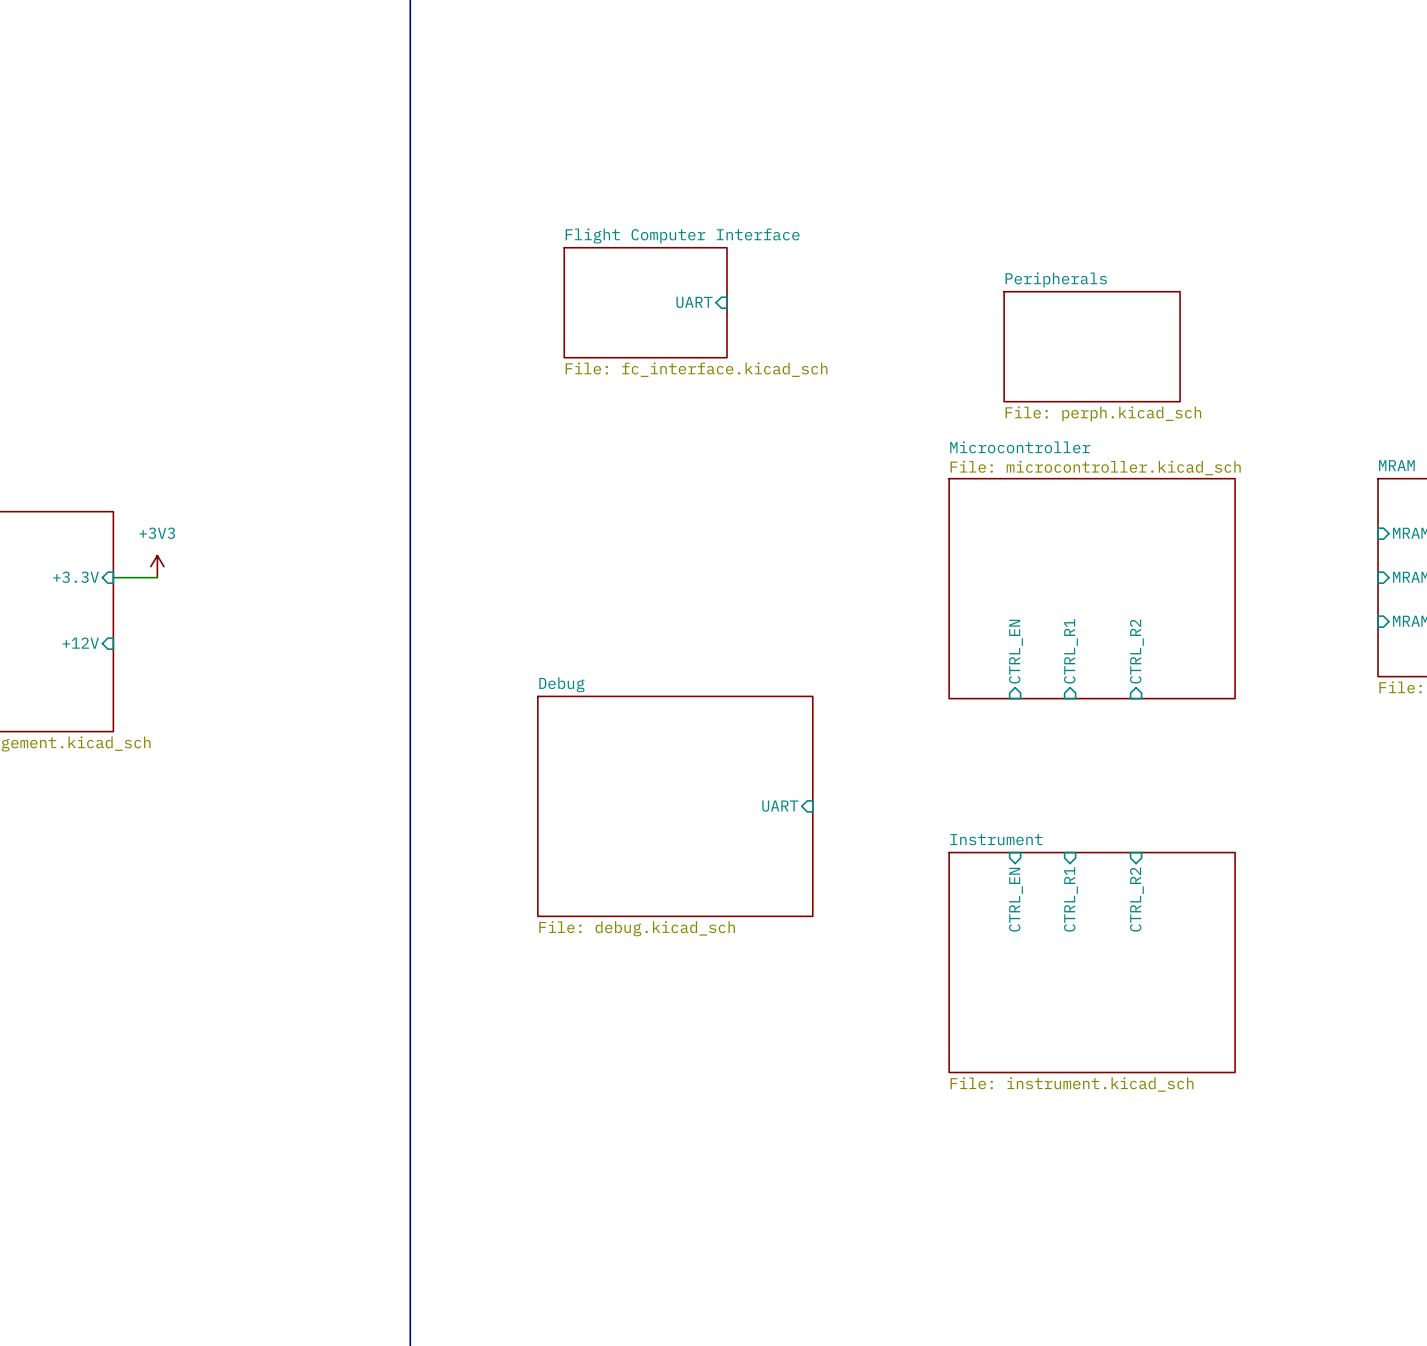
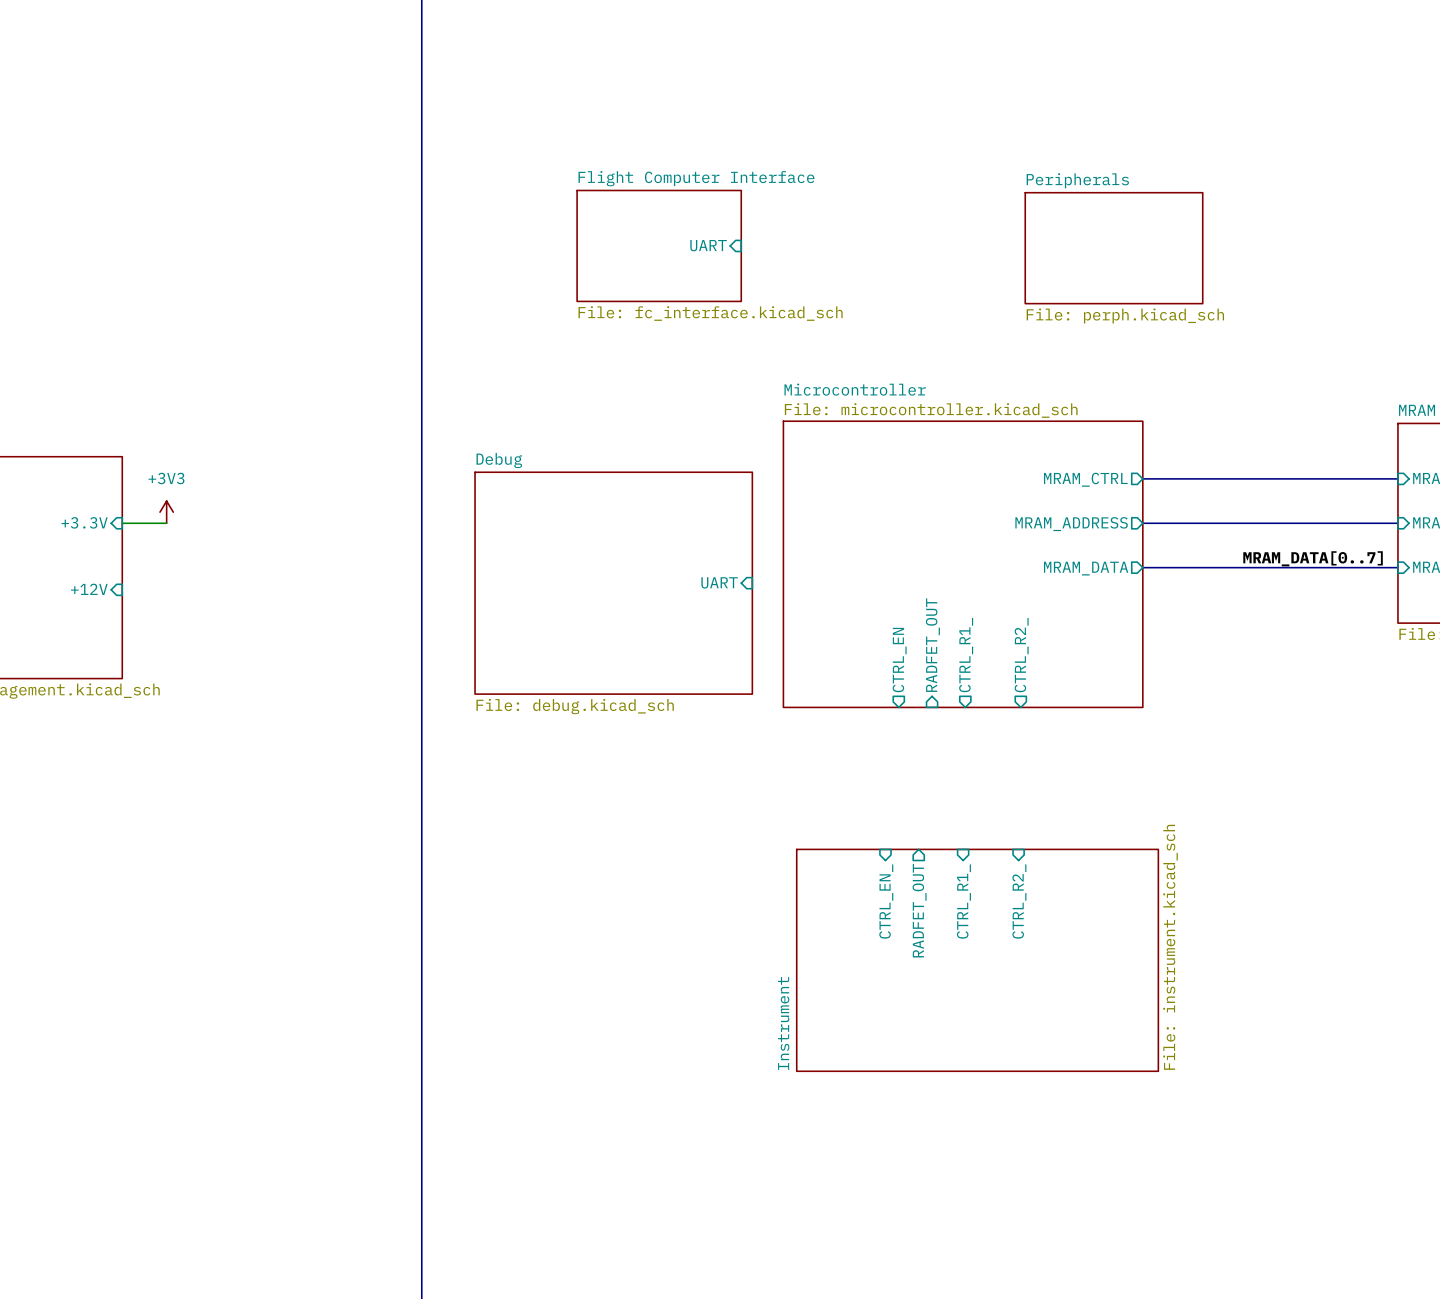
sheet Peripherals position: (1092, 346) -> (1113, 248)
bus: none -> (1142, 478) (1397, 478)
sheet pin: none -> MRAM_CTRL (1085, 479)
bus: none -> (1142, 523) (1397, 523)
sheet pin: none -> MRAM_ADDRESS (1071, 524)
sheet Microcontroller: File: microcontroller.kicad_sch (1092, 588) -> none
label: none -> MRAM_DATA[0..7] (1313, 558)
sheet Microcontroller: none -> File: microcontroller.kicad_sch (963, 564)
bus: none -> (1142, 567) (1397, 567)
sheet pin: none -> MRAM_DATA (1086, 568)
sheet pin shape: input (1015, 651) -> output (1021, 655)
sheet pin: CTRL_EN (1015, 651) -> CTRL_R2_ (1021, 655)
sheet pin: CTRL_R1 (1070, 651) -> none
sheet pin: CTRL_R2 (1136, 651) -> none
sheet pin: none -> RADFET_OUT (932, 645)
sheet pin: none -> CTRL_R1_ (966, 655)
sheet pin: none -> CTRL_EN (899, 660)
sheet Debug position: (675, 806) -> (613, 583)
sheet pin position: UART (780, 806) -> UART (719, 582)
sheet pin: CTRL_EN (1015, 899) -> CTRL_R2_ (1019, 901)
sheet pin: CTRL_R1 (1070, 899) -> none
sheet pin: CTRL_R2 (1136, 899) -> none
sheet pin: none -> CTRL_EN_ (886, 901)
sheet pin: none -> CTRL_R1_ (963, 901)
sheet pin: none -> RADFET_OUT (919, 910)
sheet Instrument: File: instrument.kicad_sch (1092, 962) -> none
sheet Instrument: none -> File: instrument.kicad_sch (977, 960)

